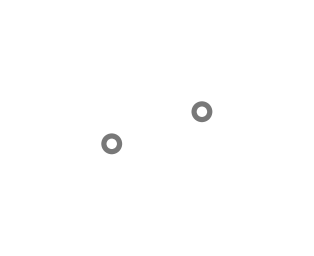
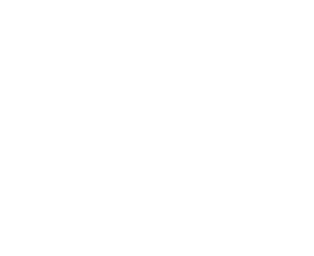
via: (201, 111) -> none
via: (111, 143) -> none

